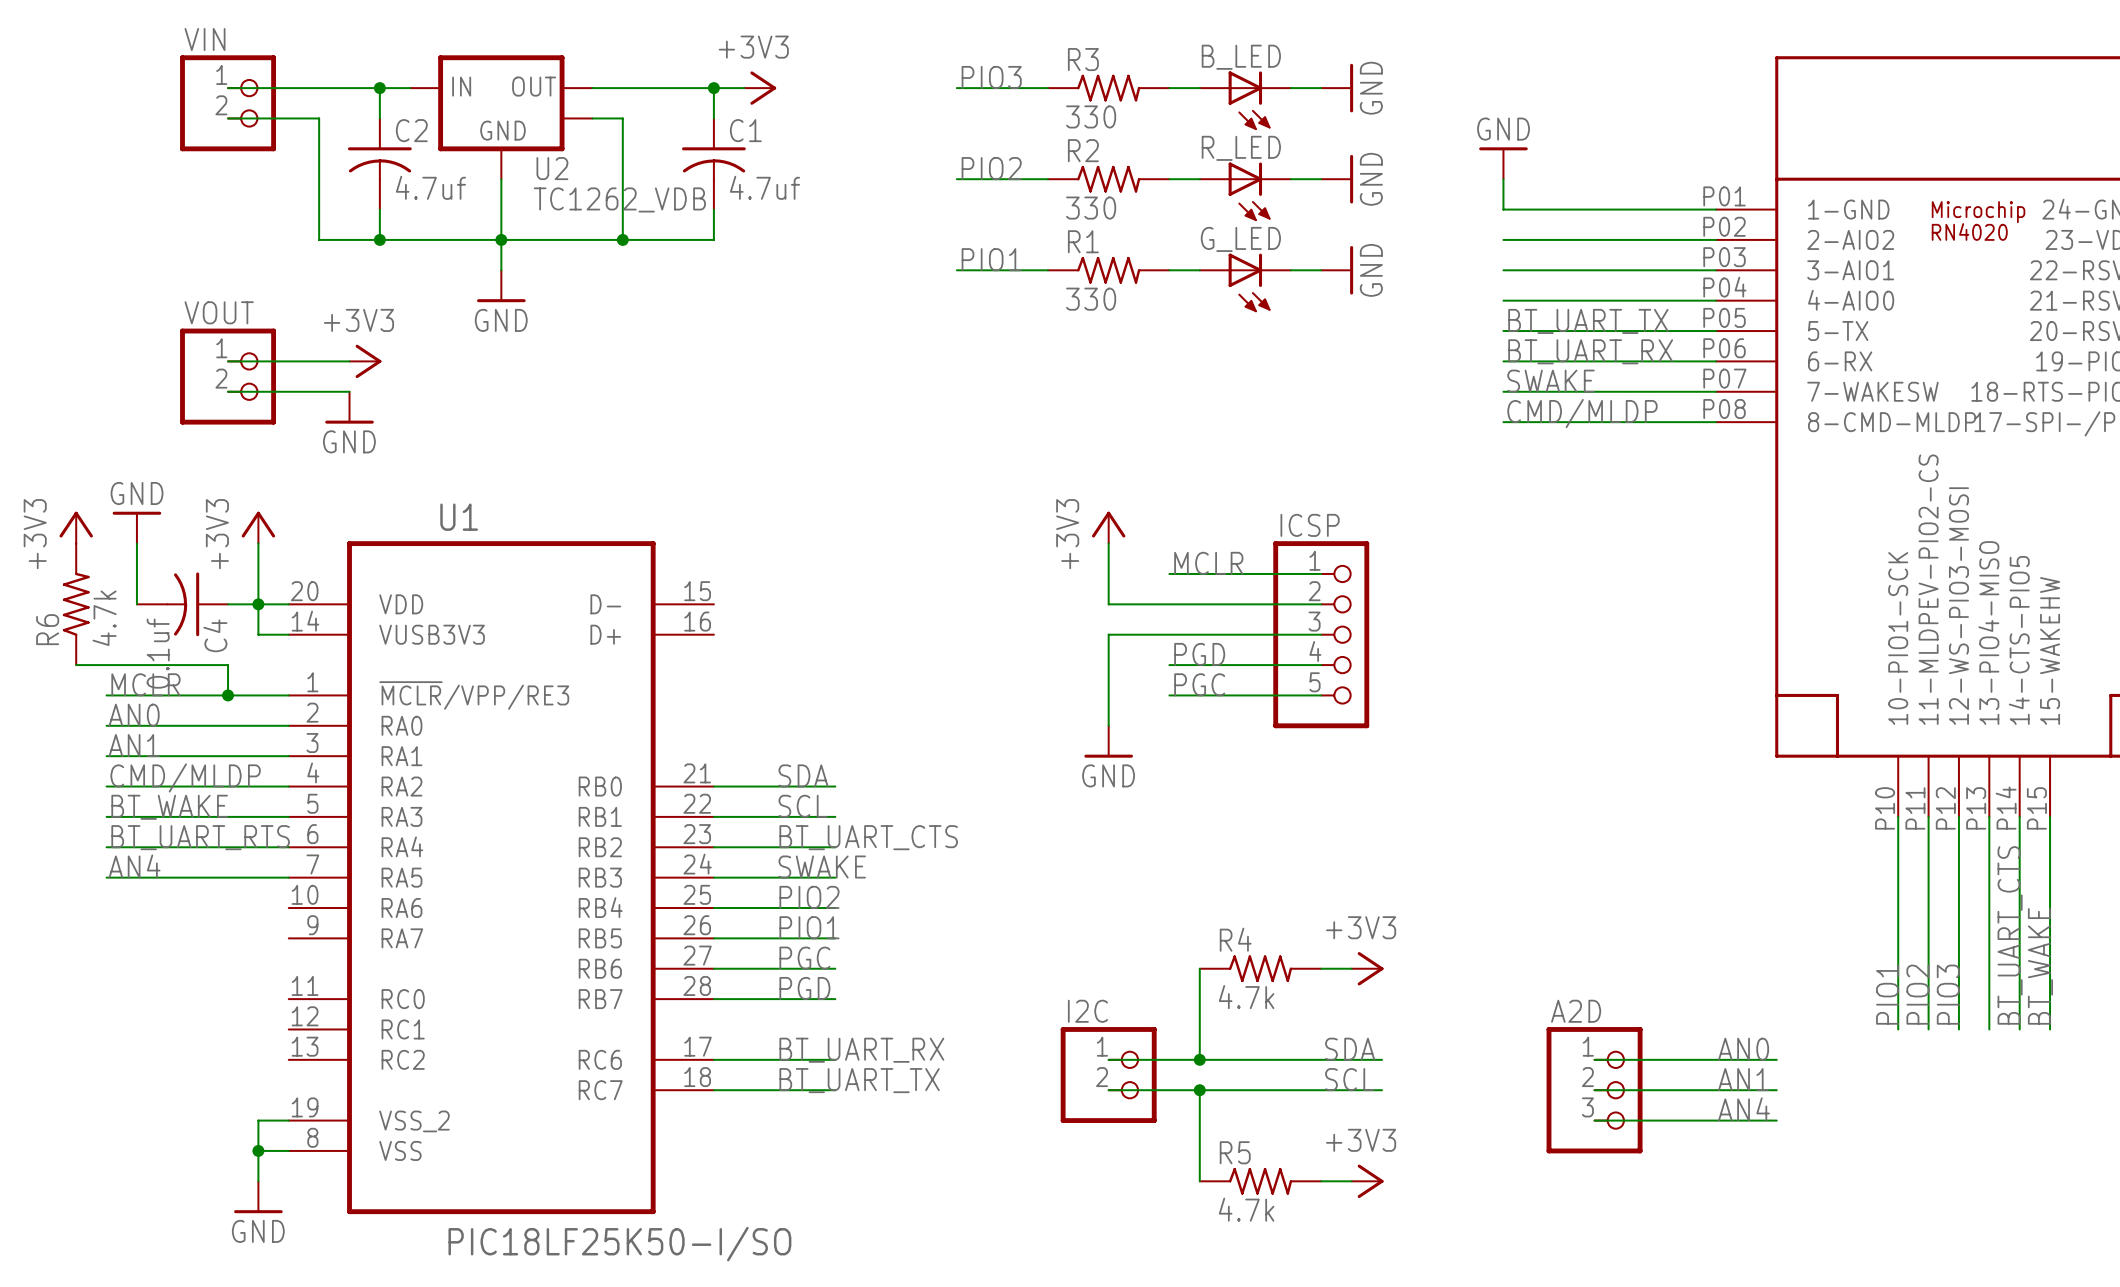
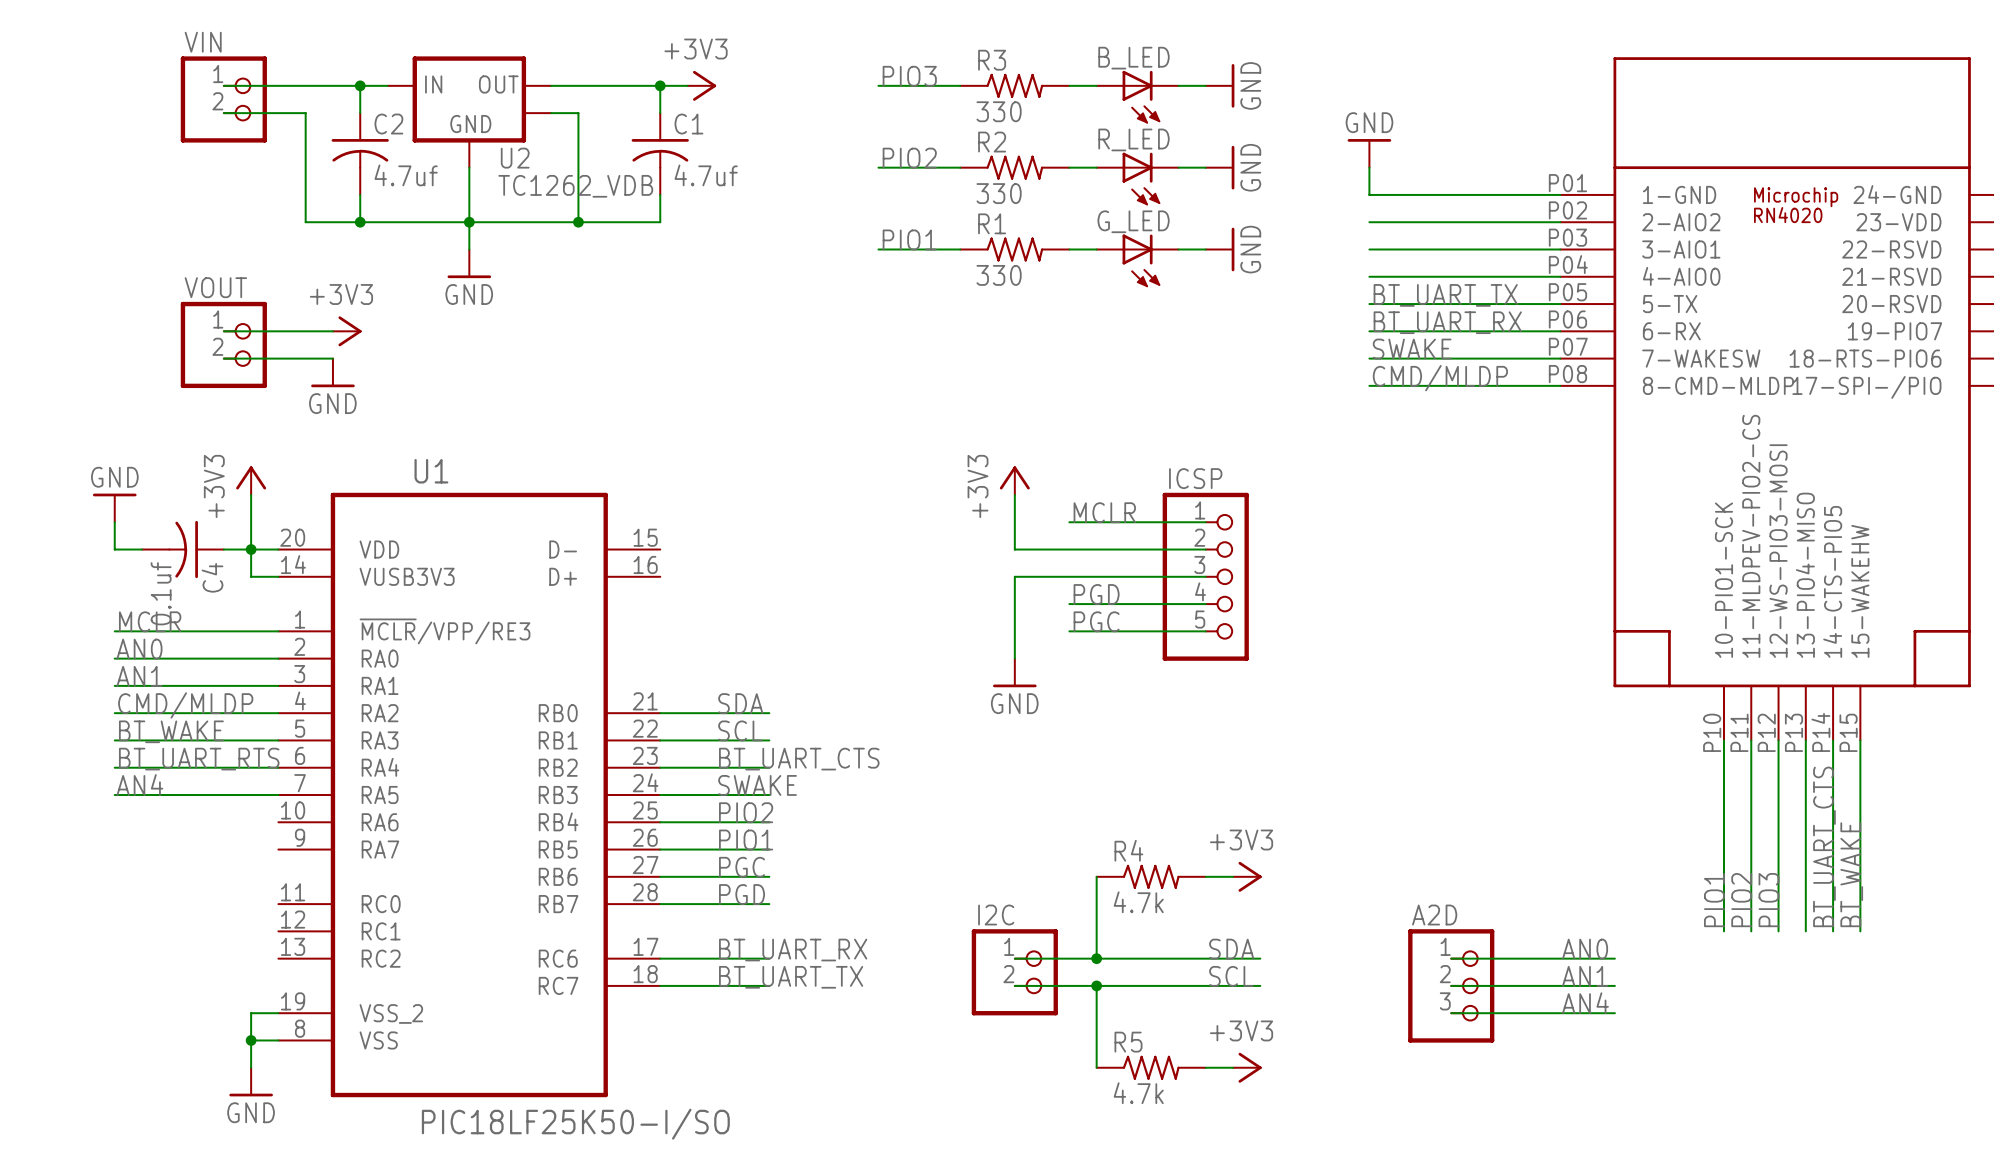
power symbol: +3V3 (76, 527) -> none
power symbol position: GND (136, 527) -> GND (114, 507)
wire: (136, 543) (136, 604) -> (114, 522) (114, 549) (142, 549)
R6: 4.7k (76, 604) -> none
wire: (76, 665) (228, 665) (228, 695) -> none
junction: (228, 695) -> none

